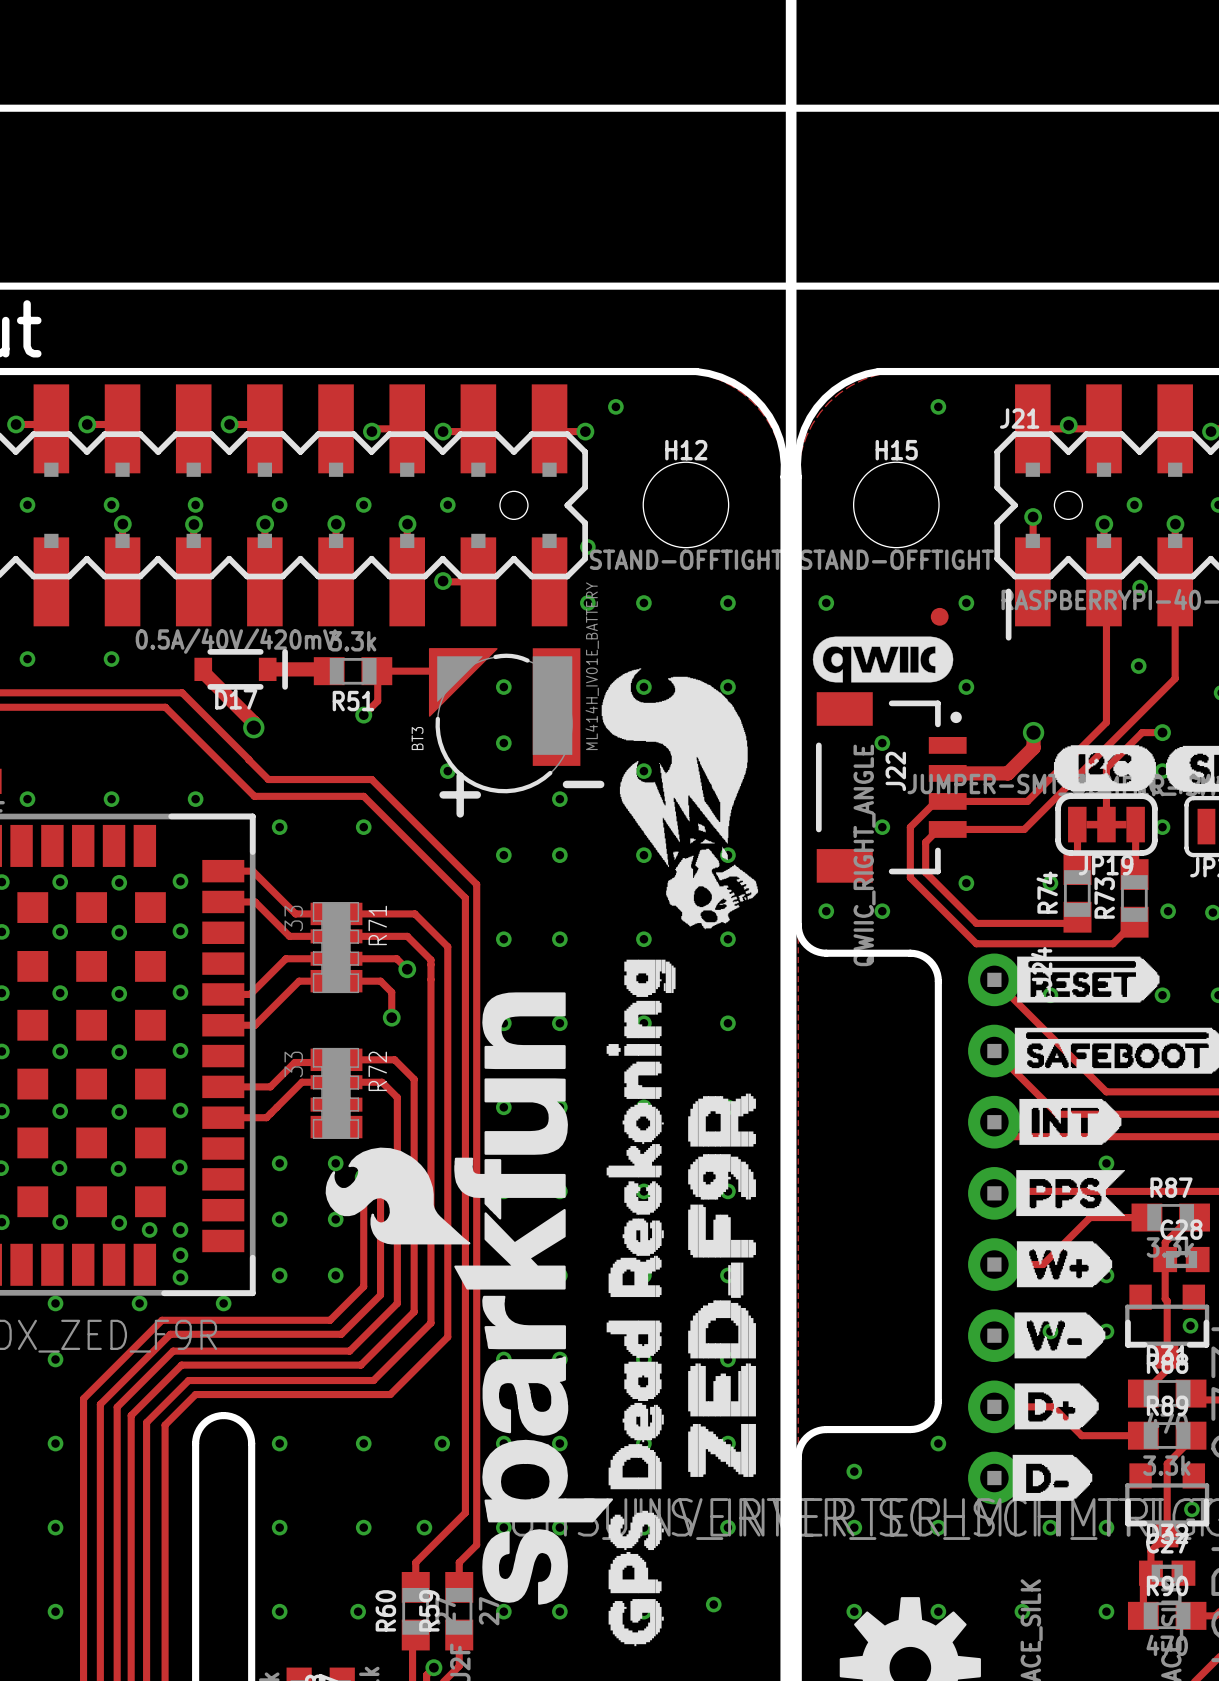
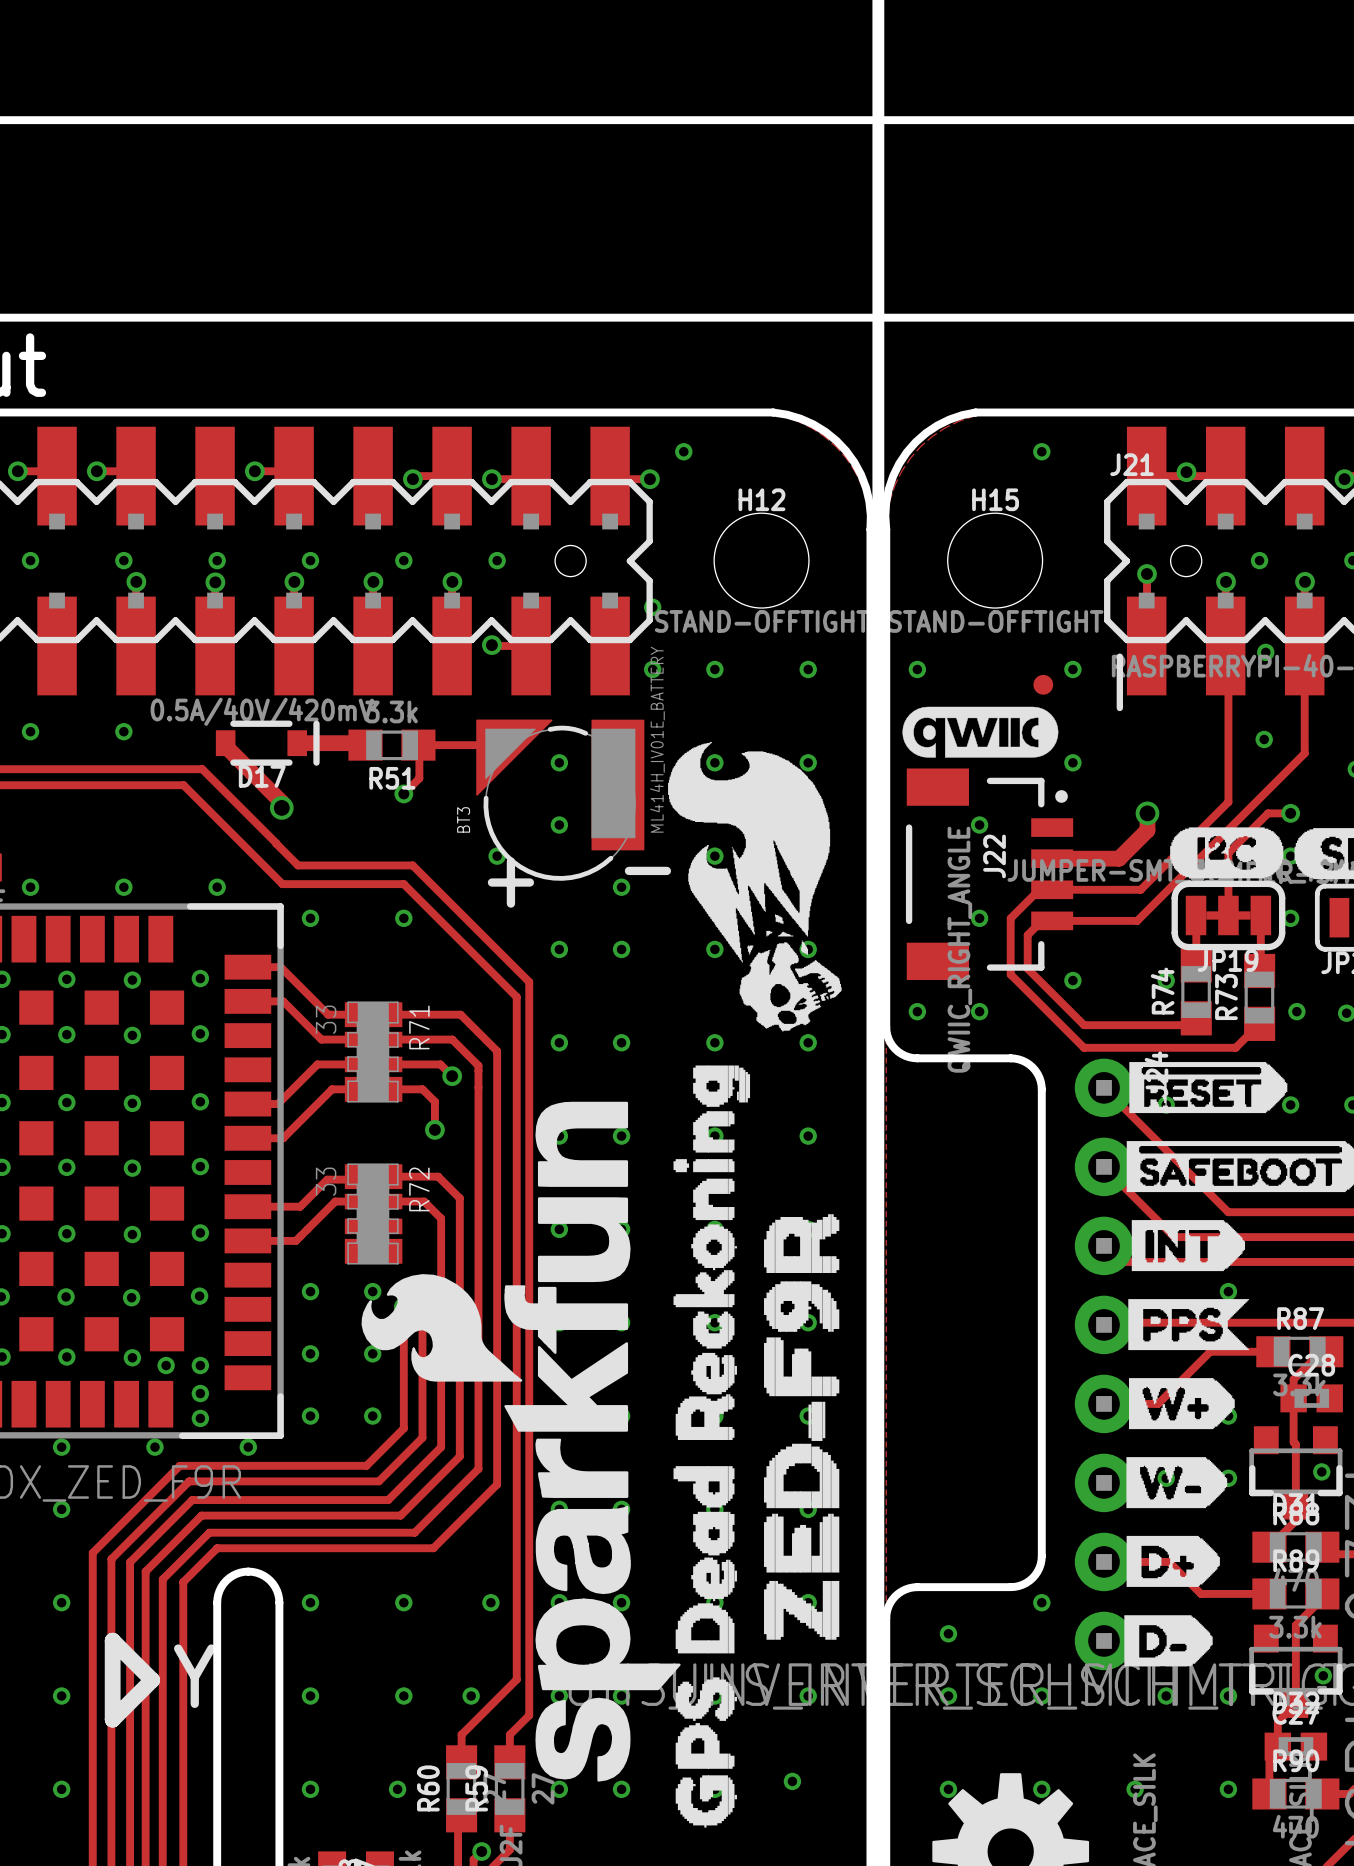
line: none -> (112, 1640) (152, 1680) (112, 1719) (112, 1640)
text: none -> Y (194, 1676)

